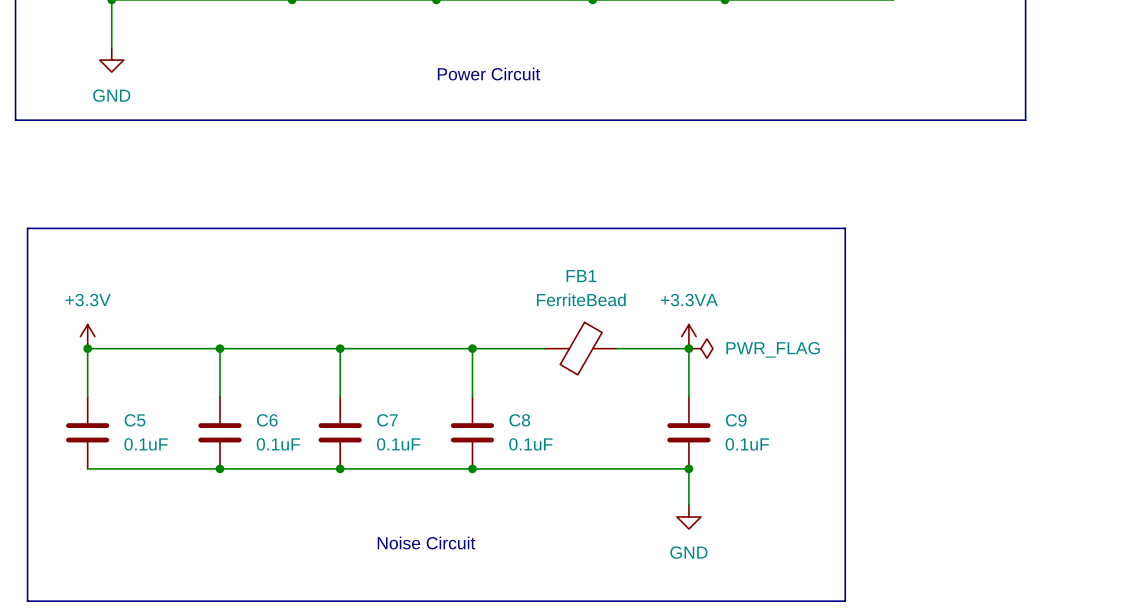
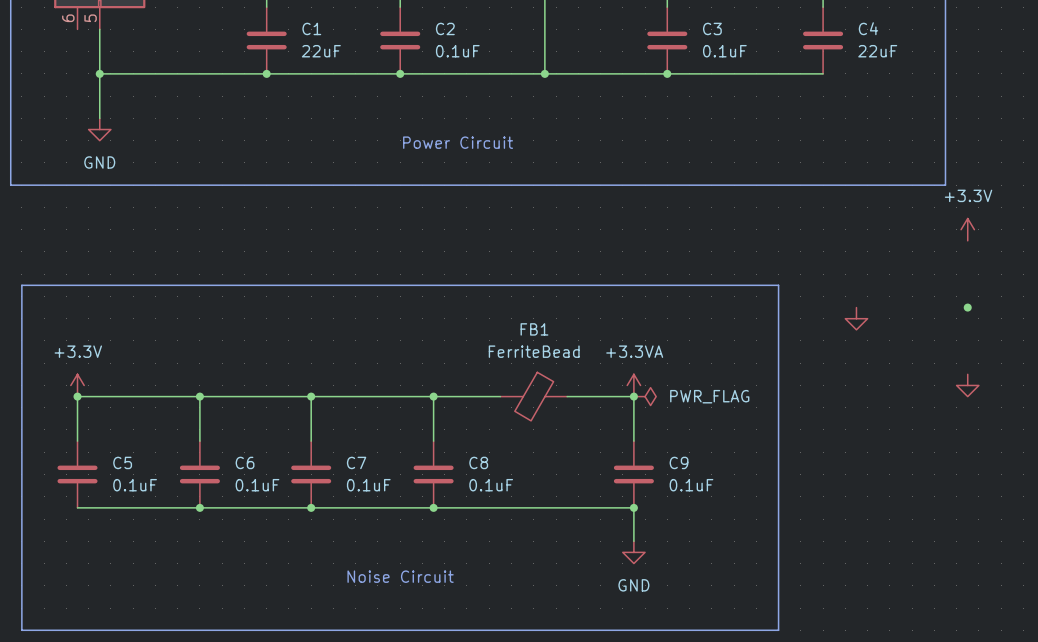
power symbol: none -> +3.3V (967, 229)
junction: none -> (967, 307)
power symbol: none -> (856, 318)
power symbol: none -> (967, 385)

